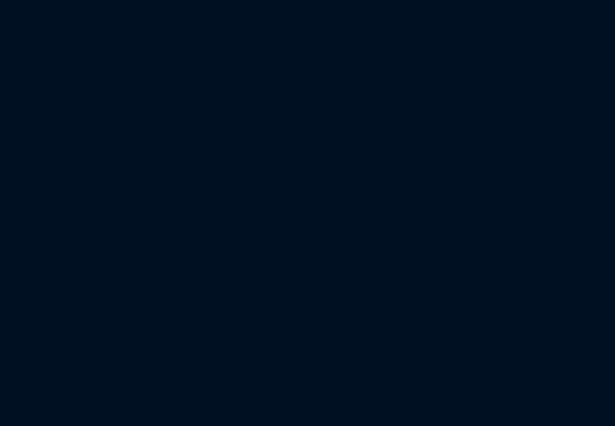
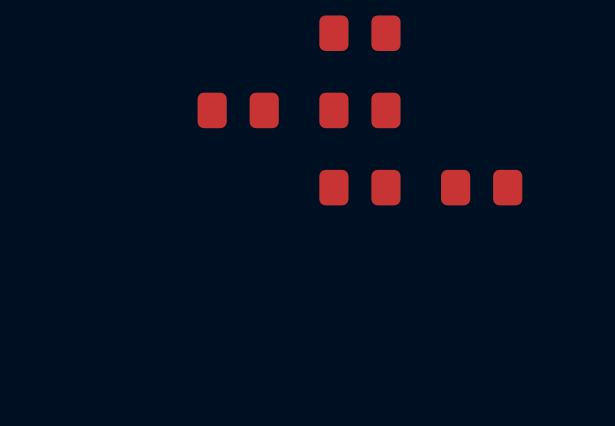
part: none -> (359, 33)
part: none -> (238, 110)
part: none -> (359, 110)
part: none -> (359, 187)
part: none -> (481, 187)

